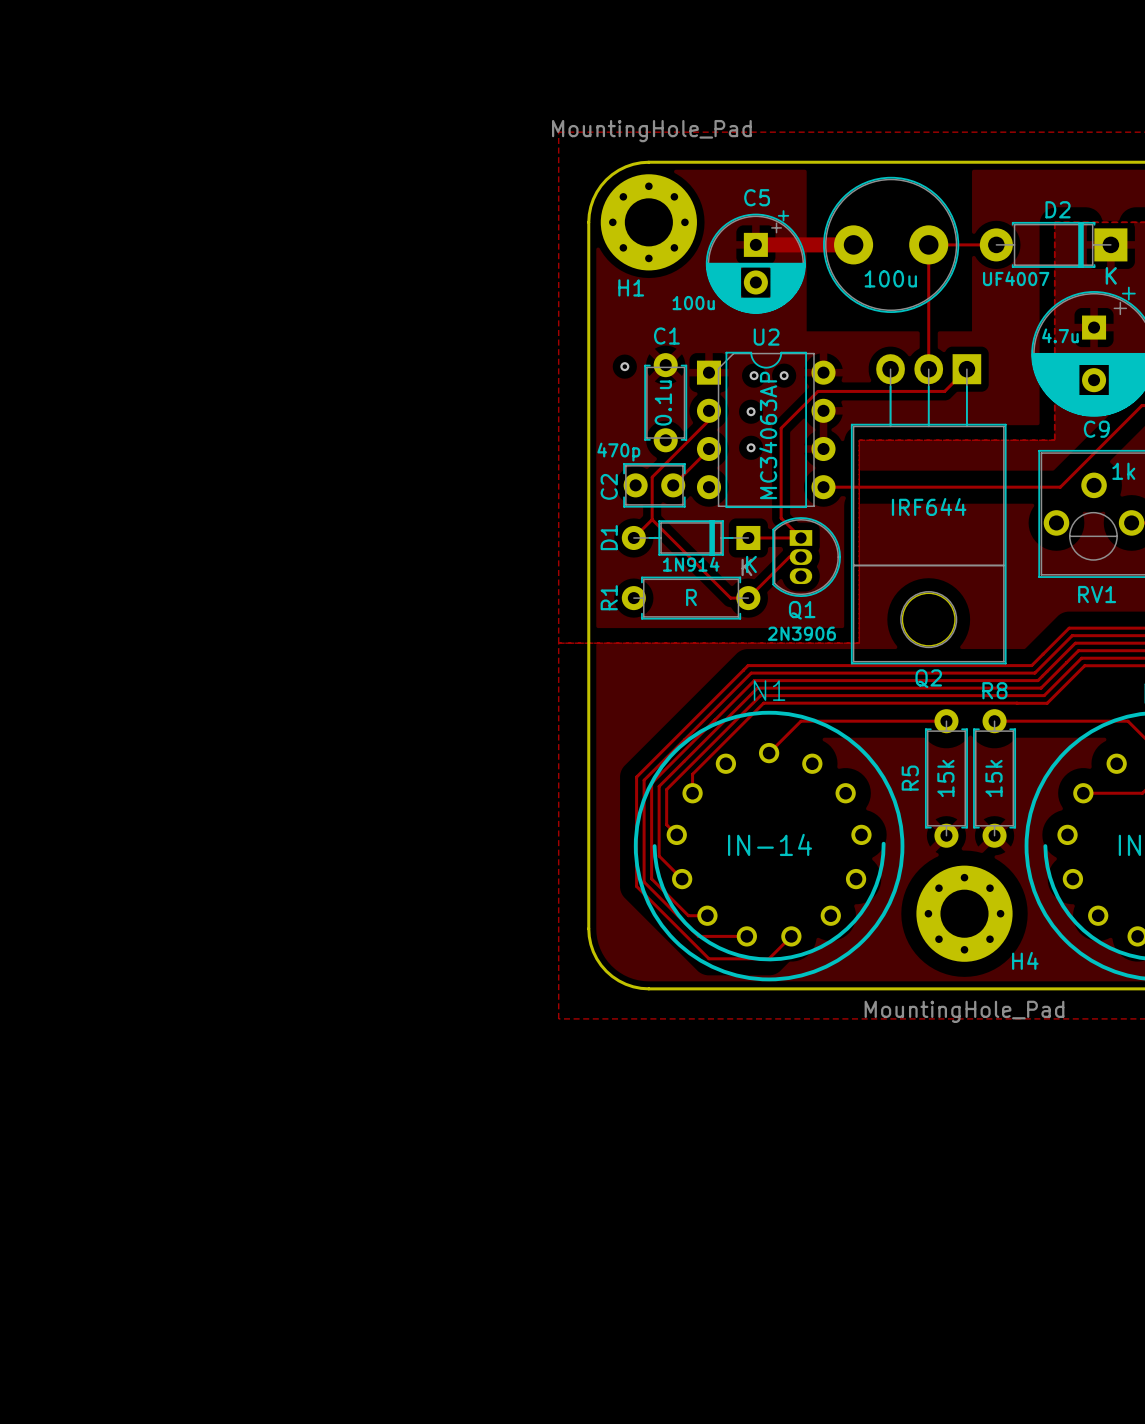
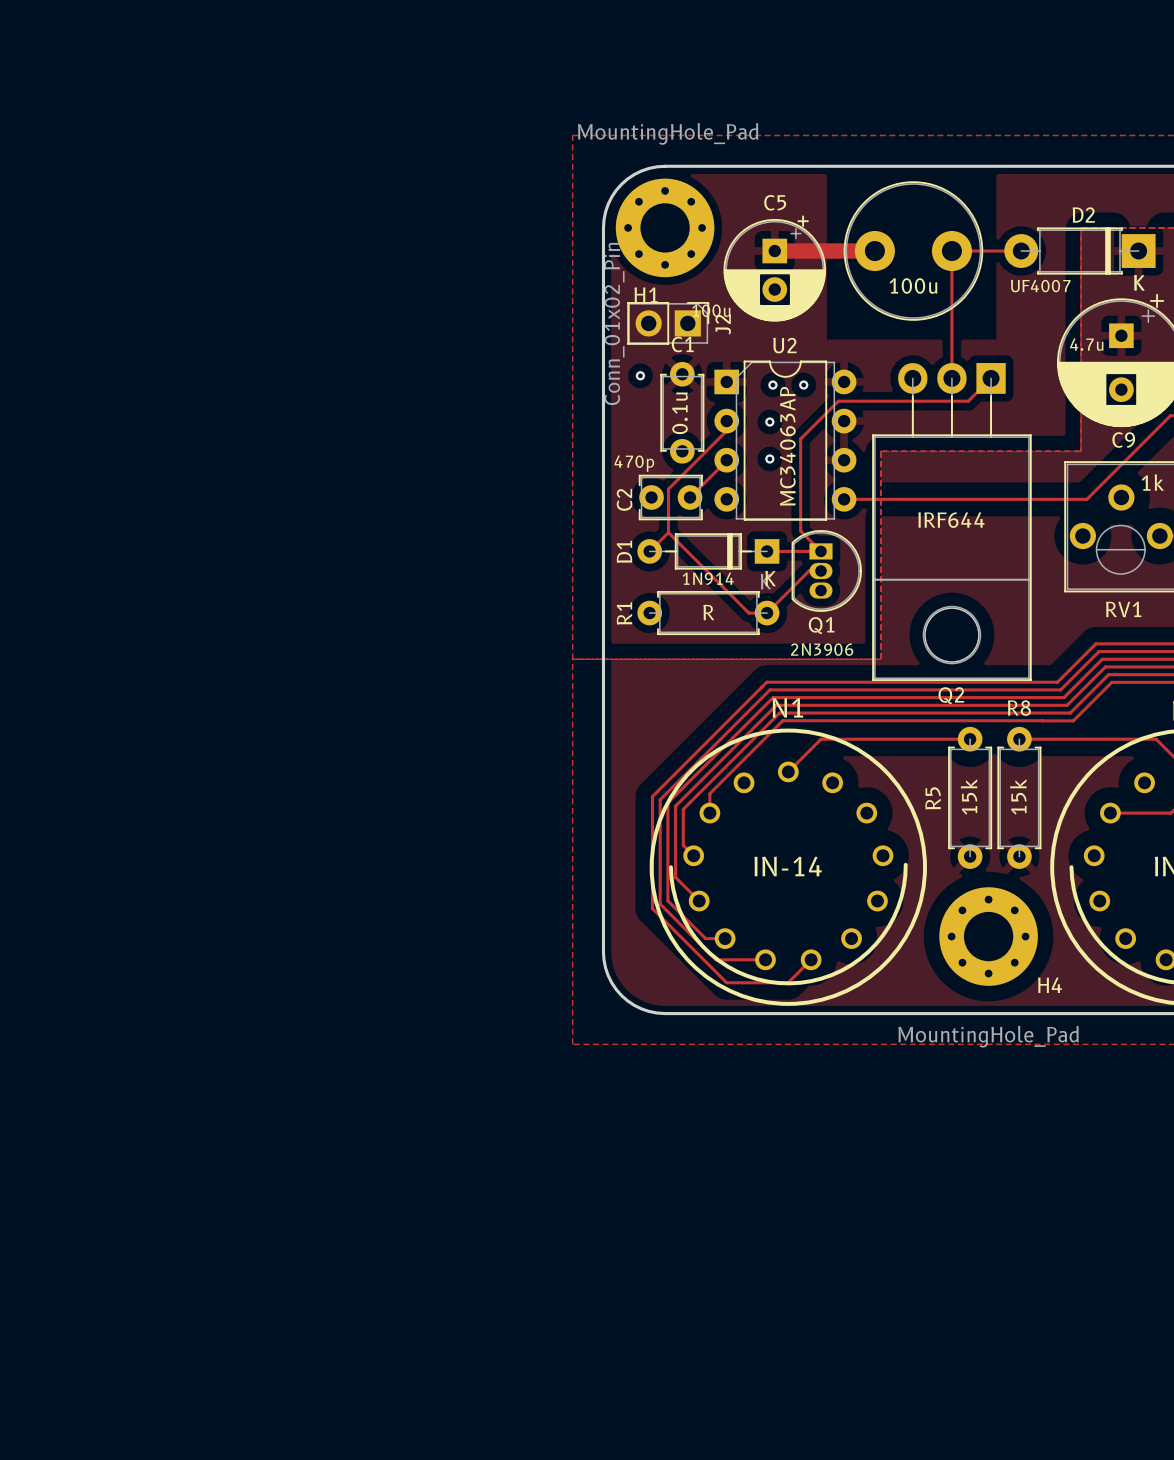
J2: none -> Conn_01x02_Pin (668, 323)

